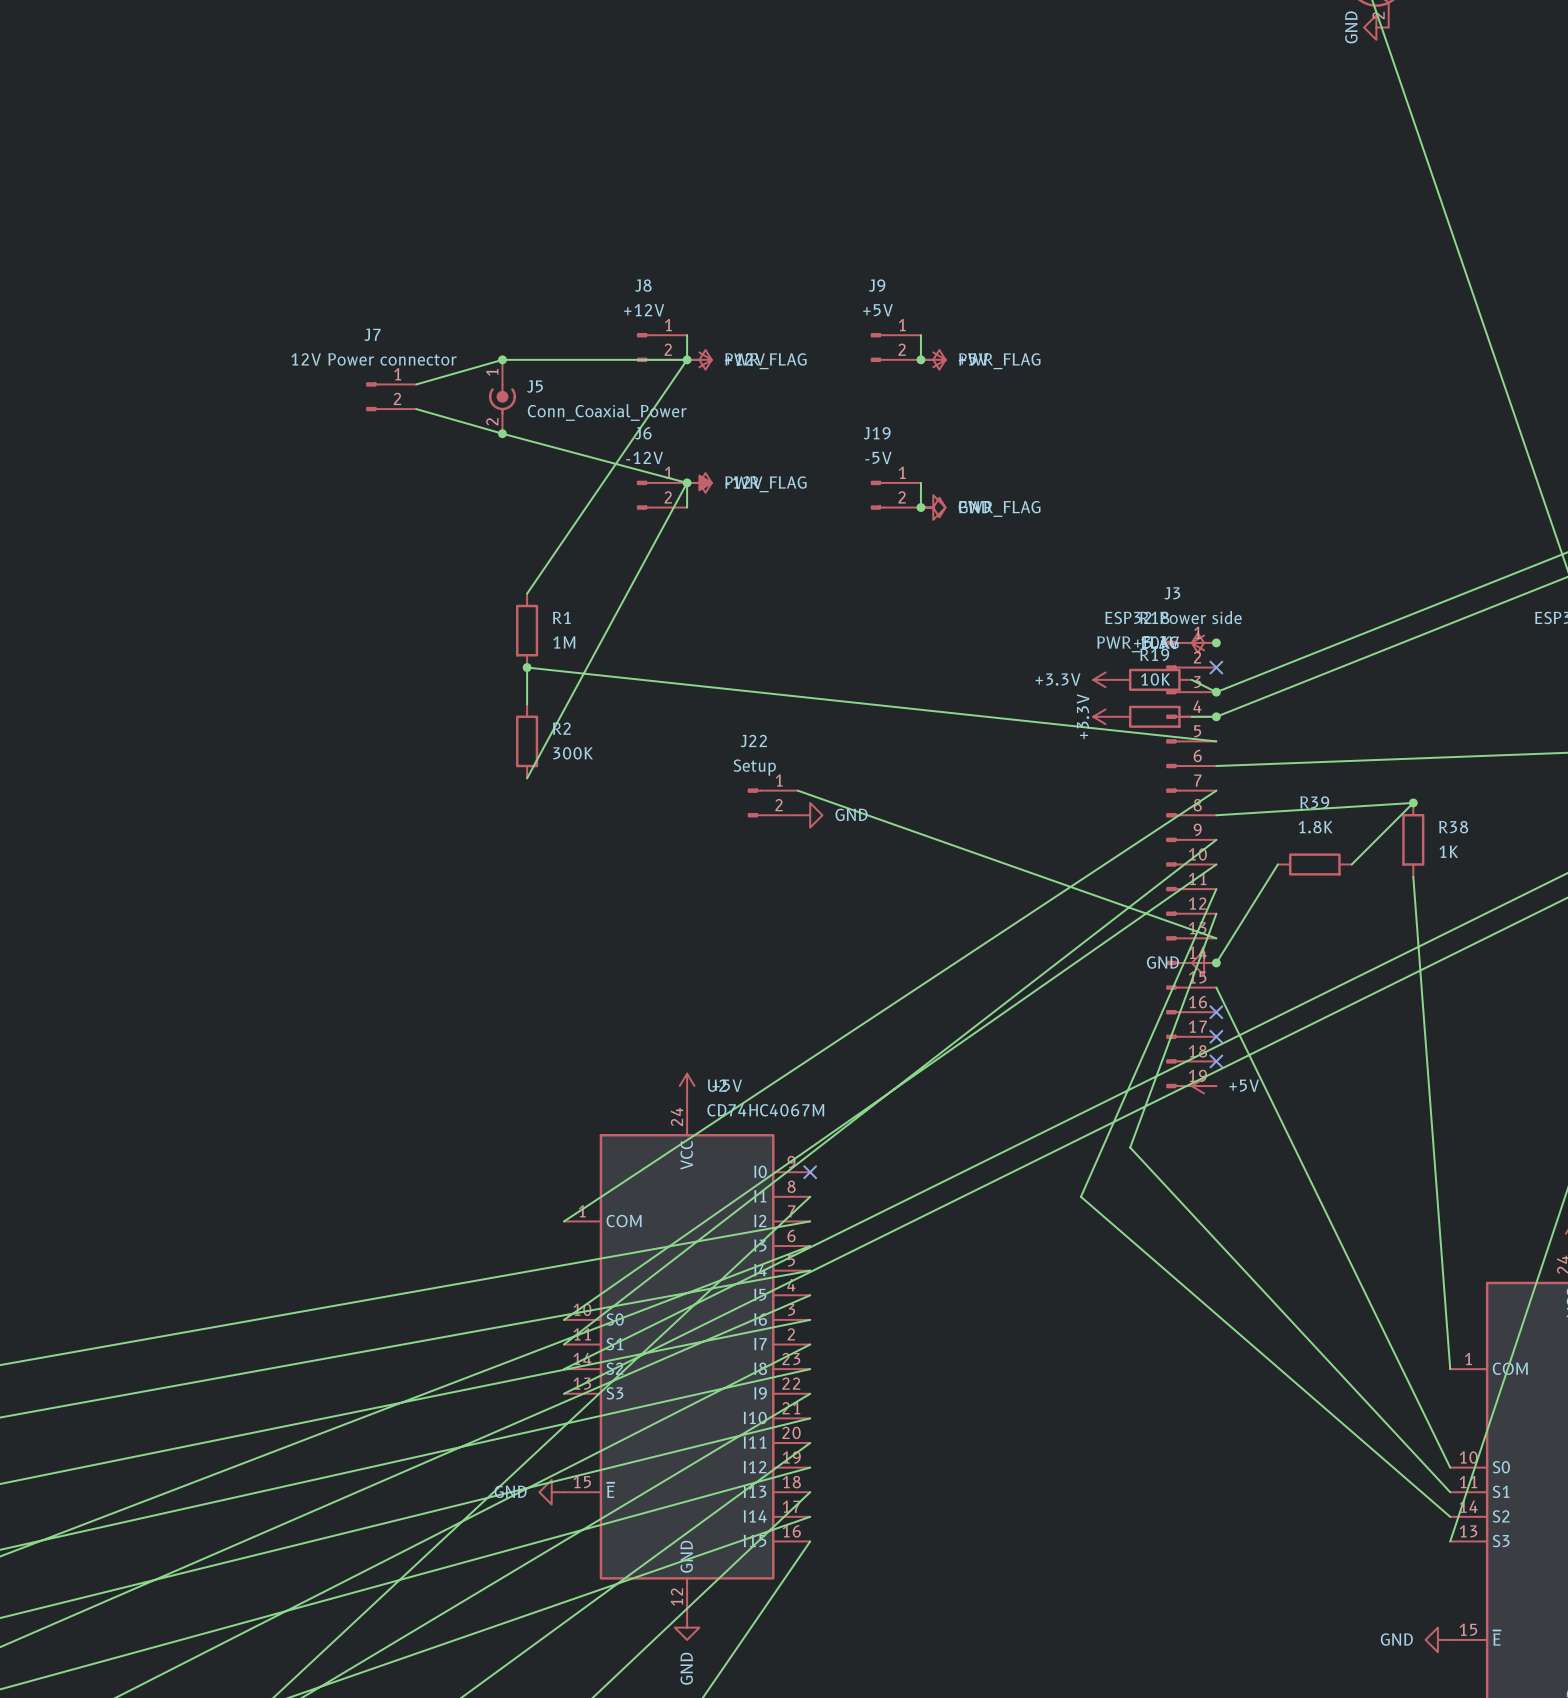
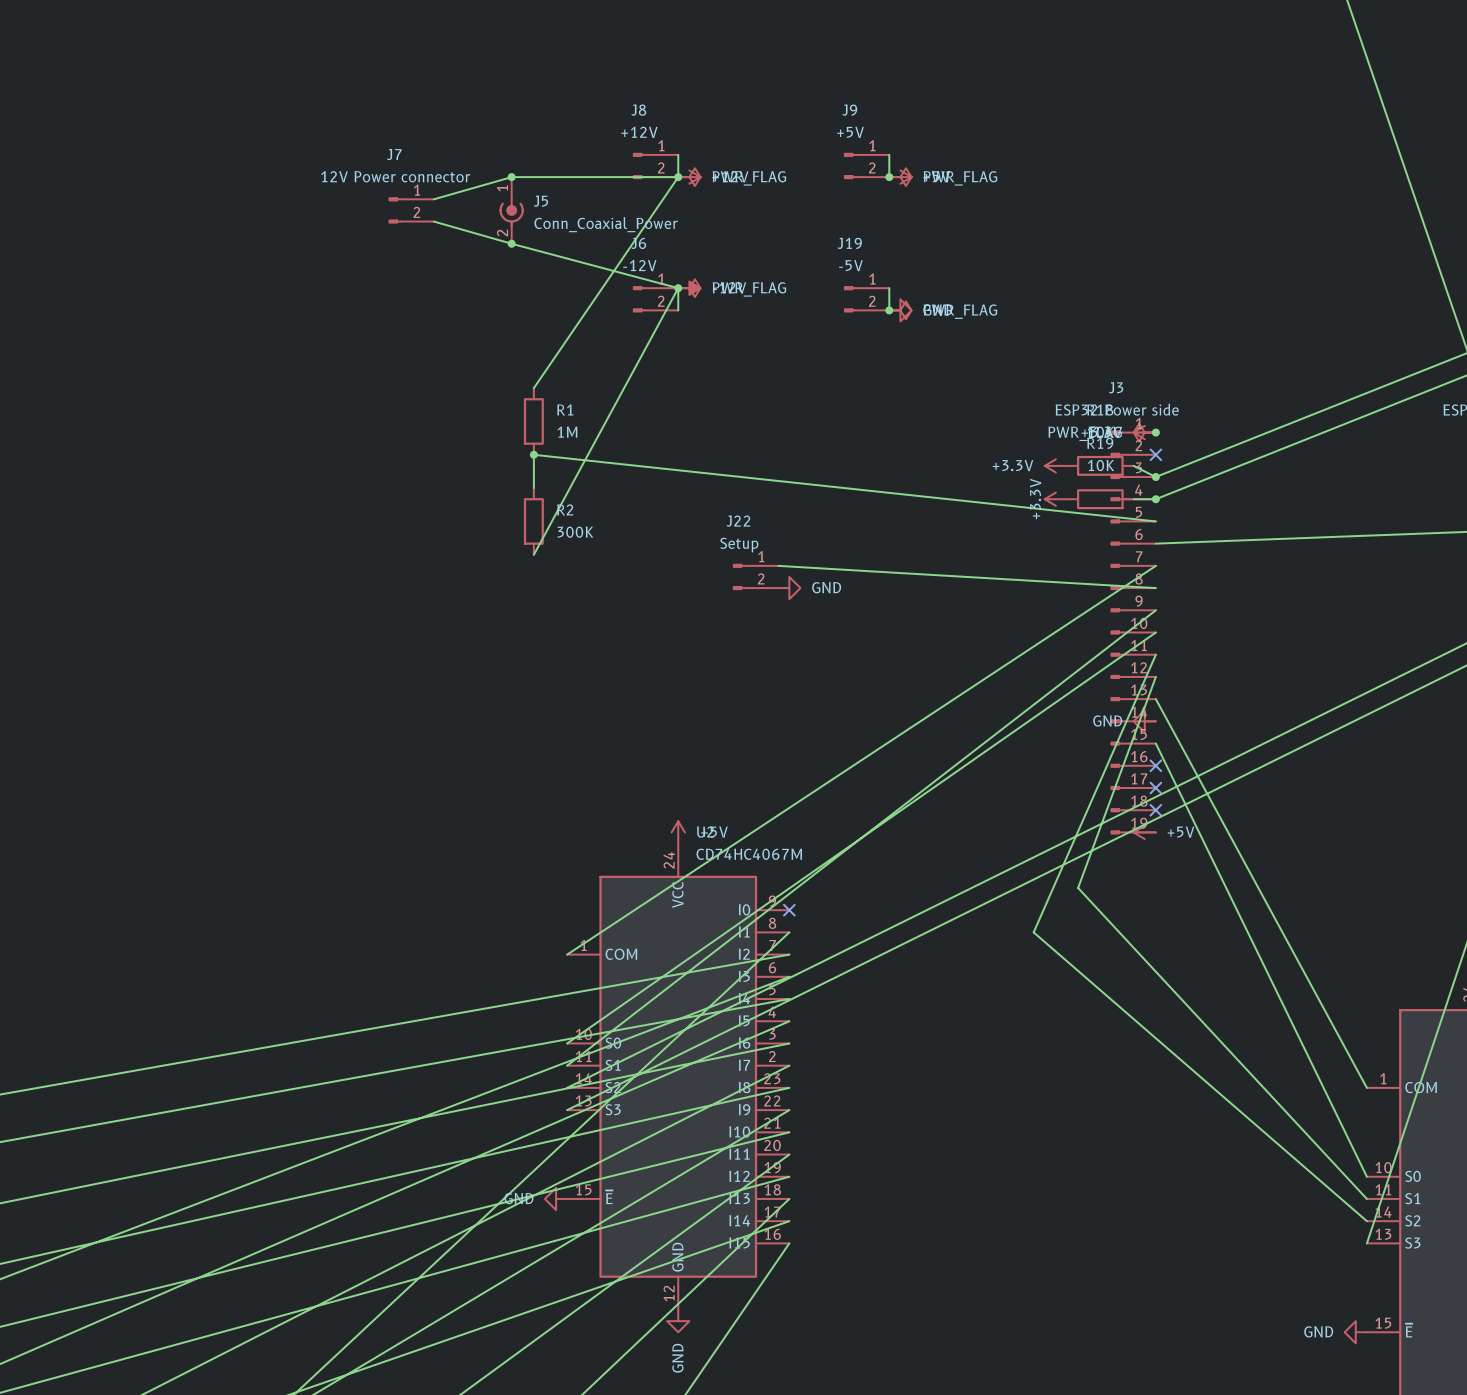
wire: (797, 790) (1216, 938) -> (778, 565) (1155, 588)
junction: (1413, 802) -> none
wire: (1216, 815) (1413, 802) (1351, 864) -> none
R38: 1K (1413, 839) -> none
wire: (1277, 864) (1216, 962) -> none
R39: 1.8K (1314, 864) -> none
wire: (1413, 876) (1450, 1369) -> (1155, 699) (1366, 1087)
junction: (1216, 962) -> none

